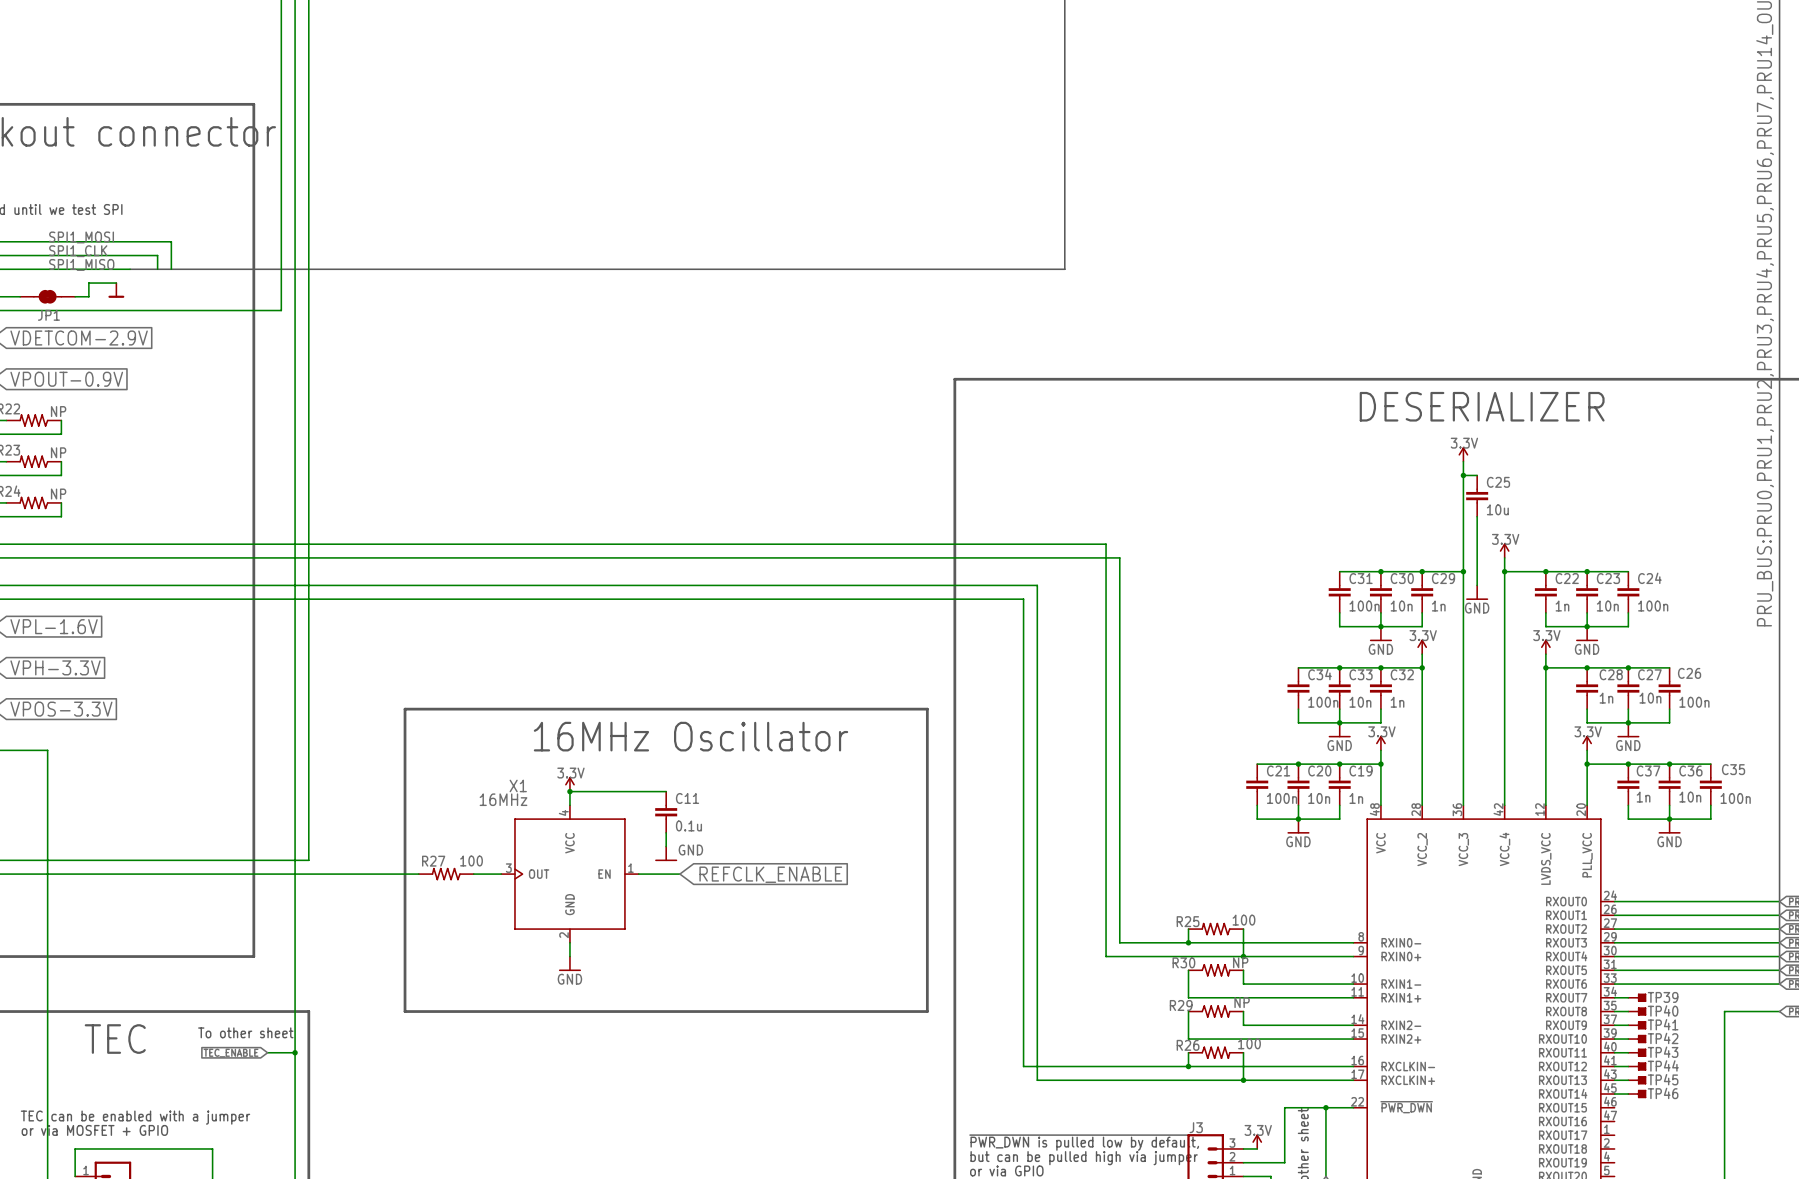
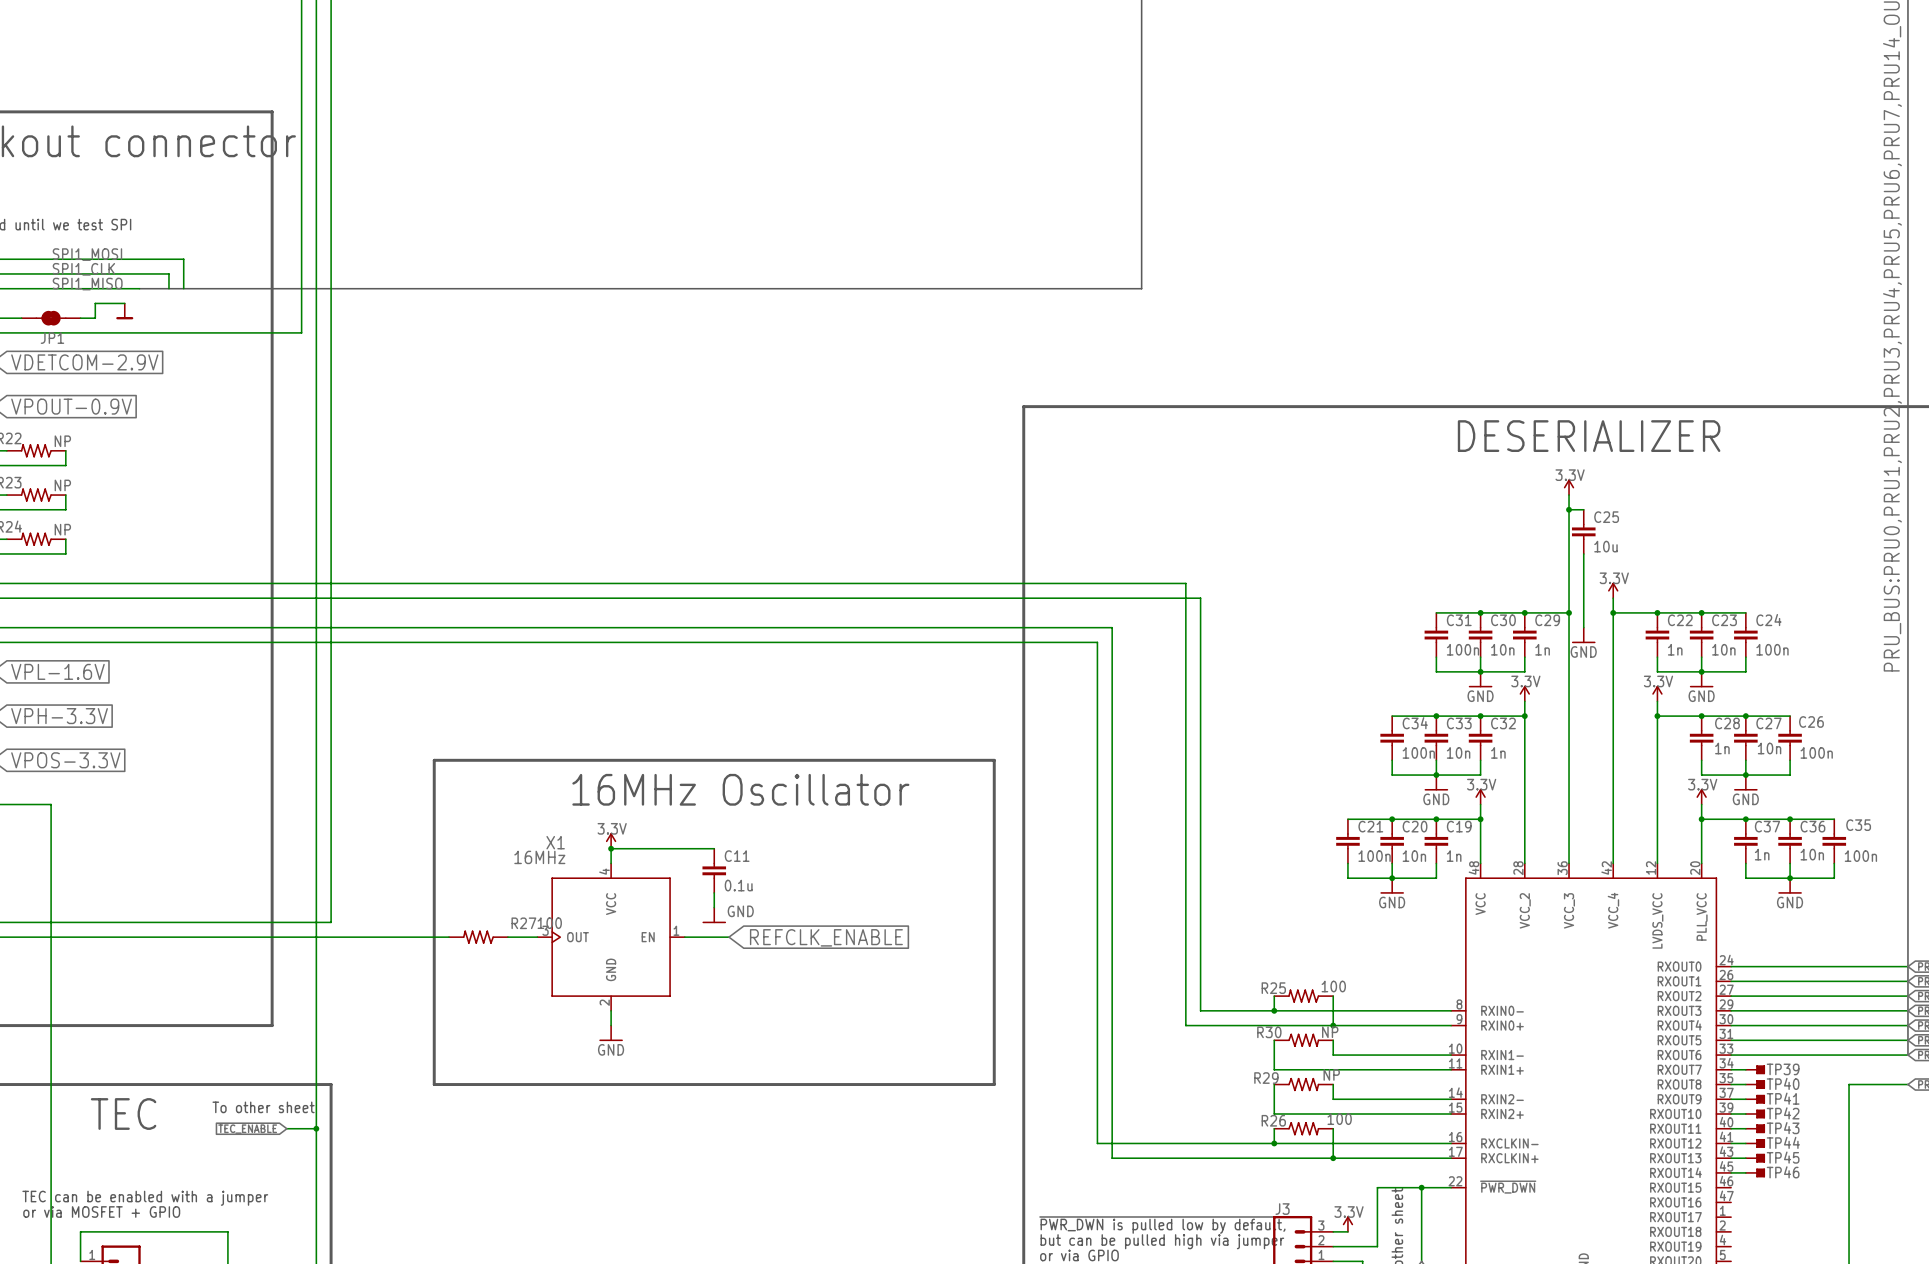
R27 name position: R27 (433, 861) -> R27 (523, 923)
R27 value position: 100 (471, 861) -> 100 (549, 923)

